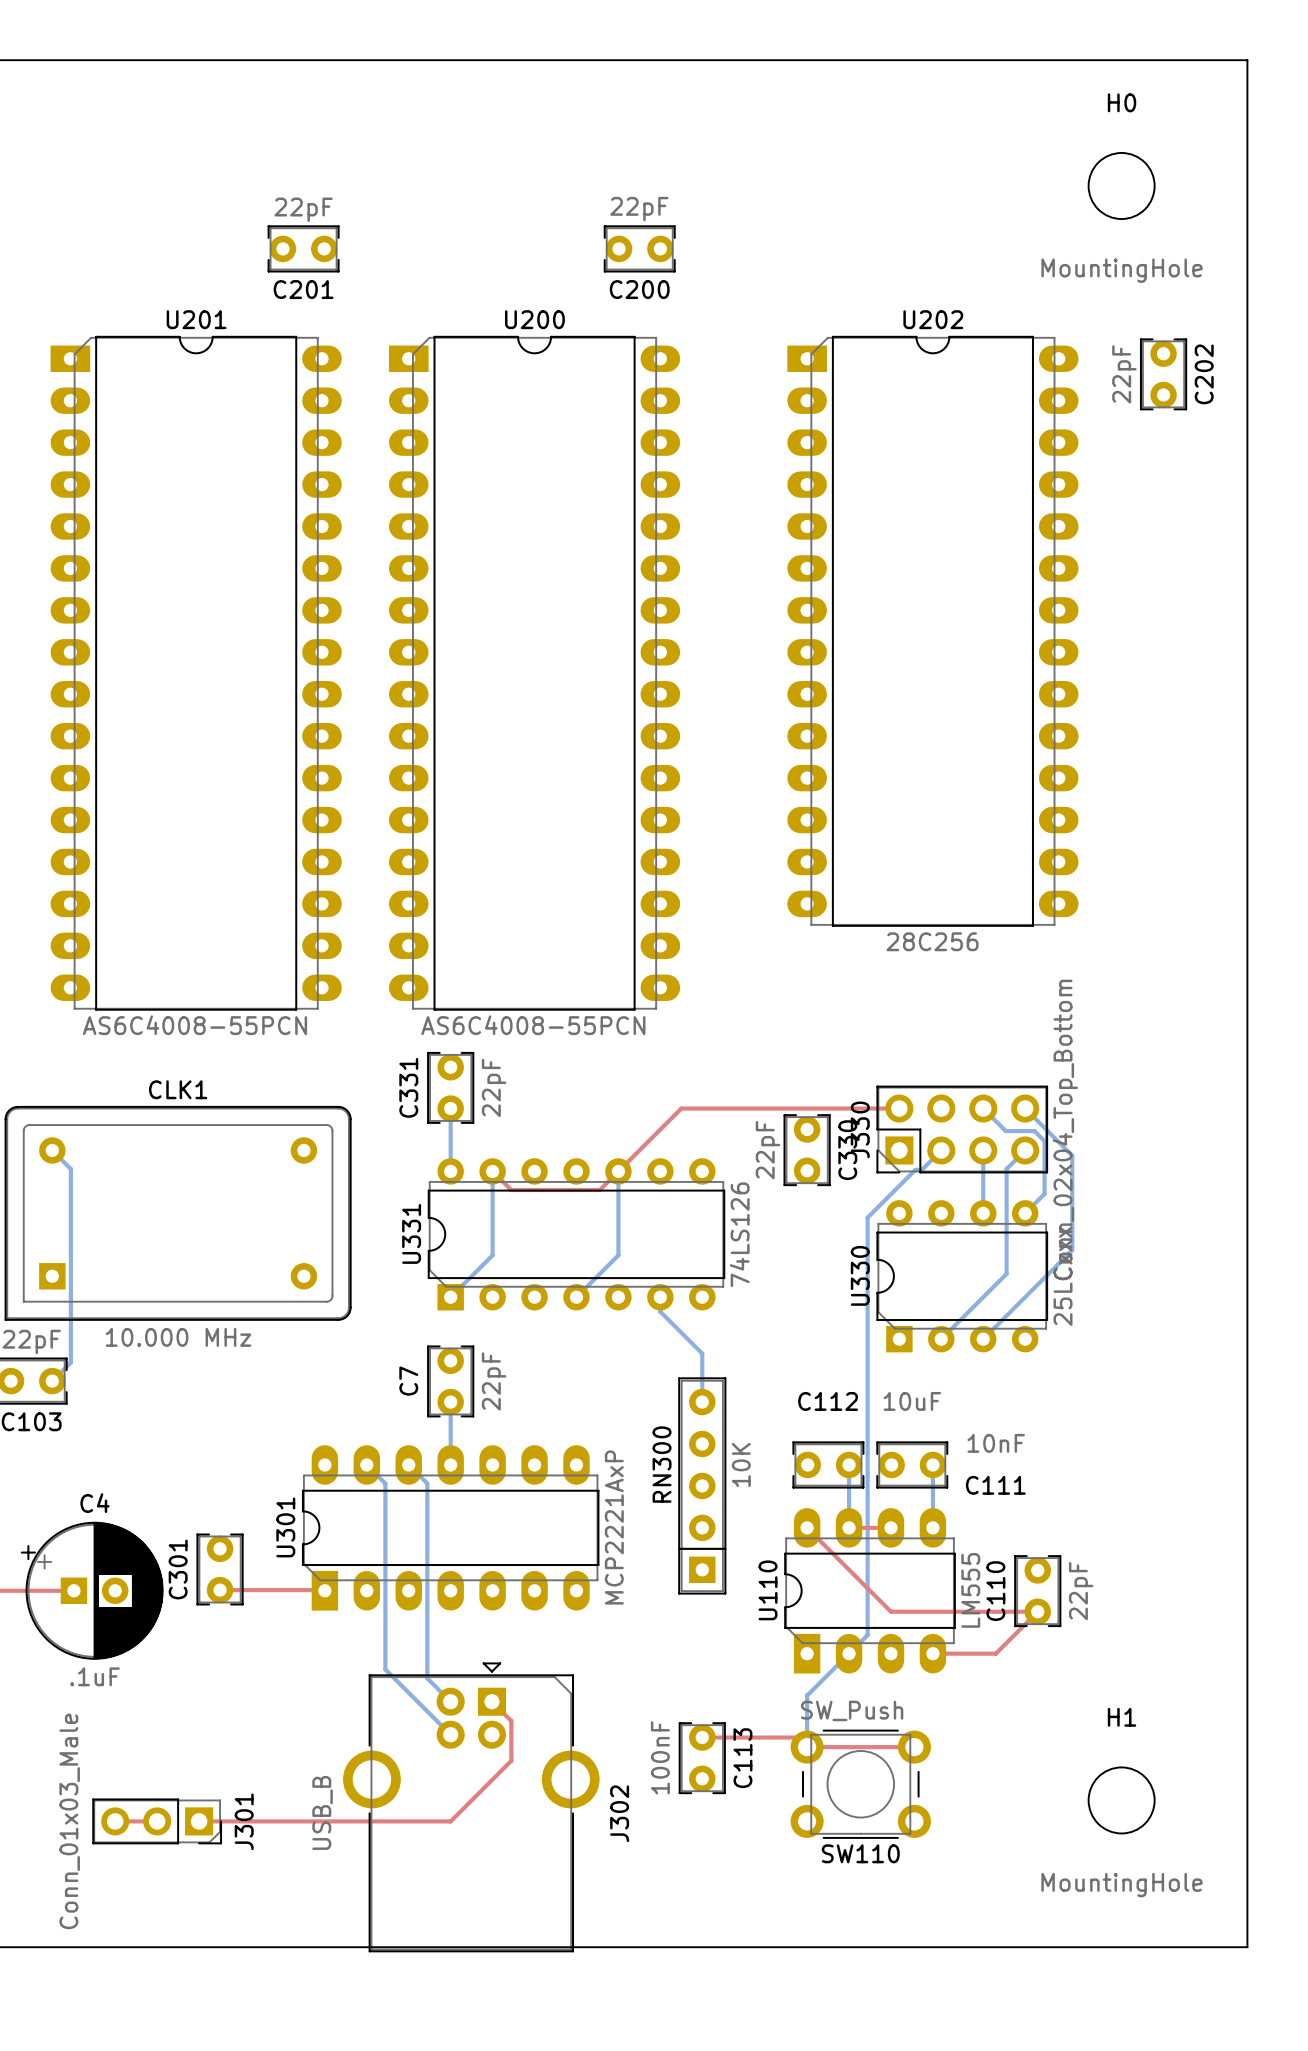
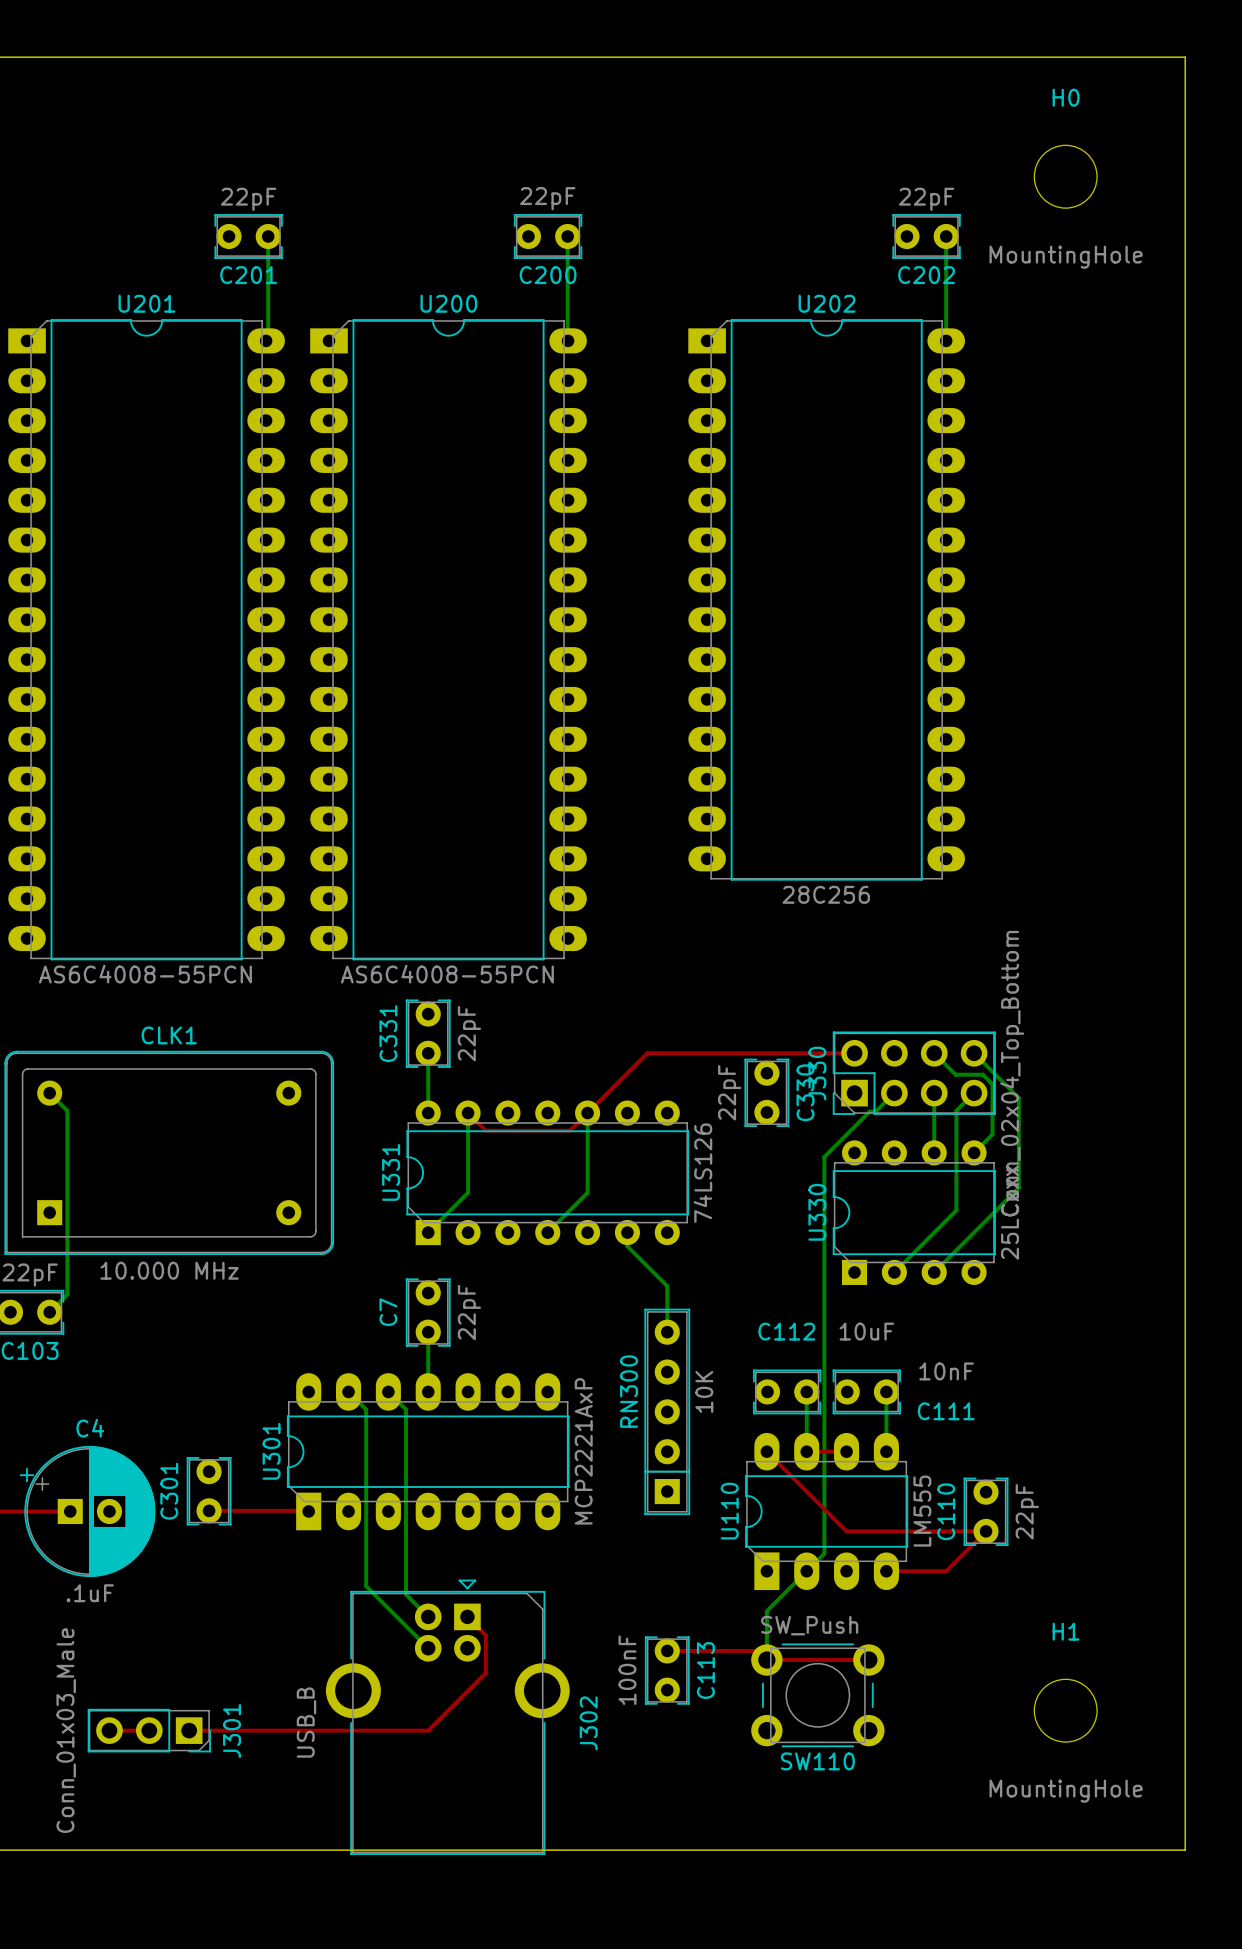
bottom track: none -> (268, 236) (268, 338) (266, 340)
C201 position: (303, 248) -> (248, 236)
bottom track: none -> (567, 236) (568, 340)
C200 position: (639, 248) -> (548, 236)
bottom track: none -> (946, 236) (946, 340)
C202 rotation: 0° (1163, 374) -> 90° clockwise (926, 236)
C202 position: (1163, 374) -> (926, 236)
U202 position: (932, 631) -> (826, 599)
U201 position: (196, 673) -> (146, 639)
U200 position: (534, 673) -> (448, 639)

